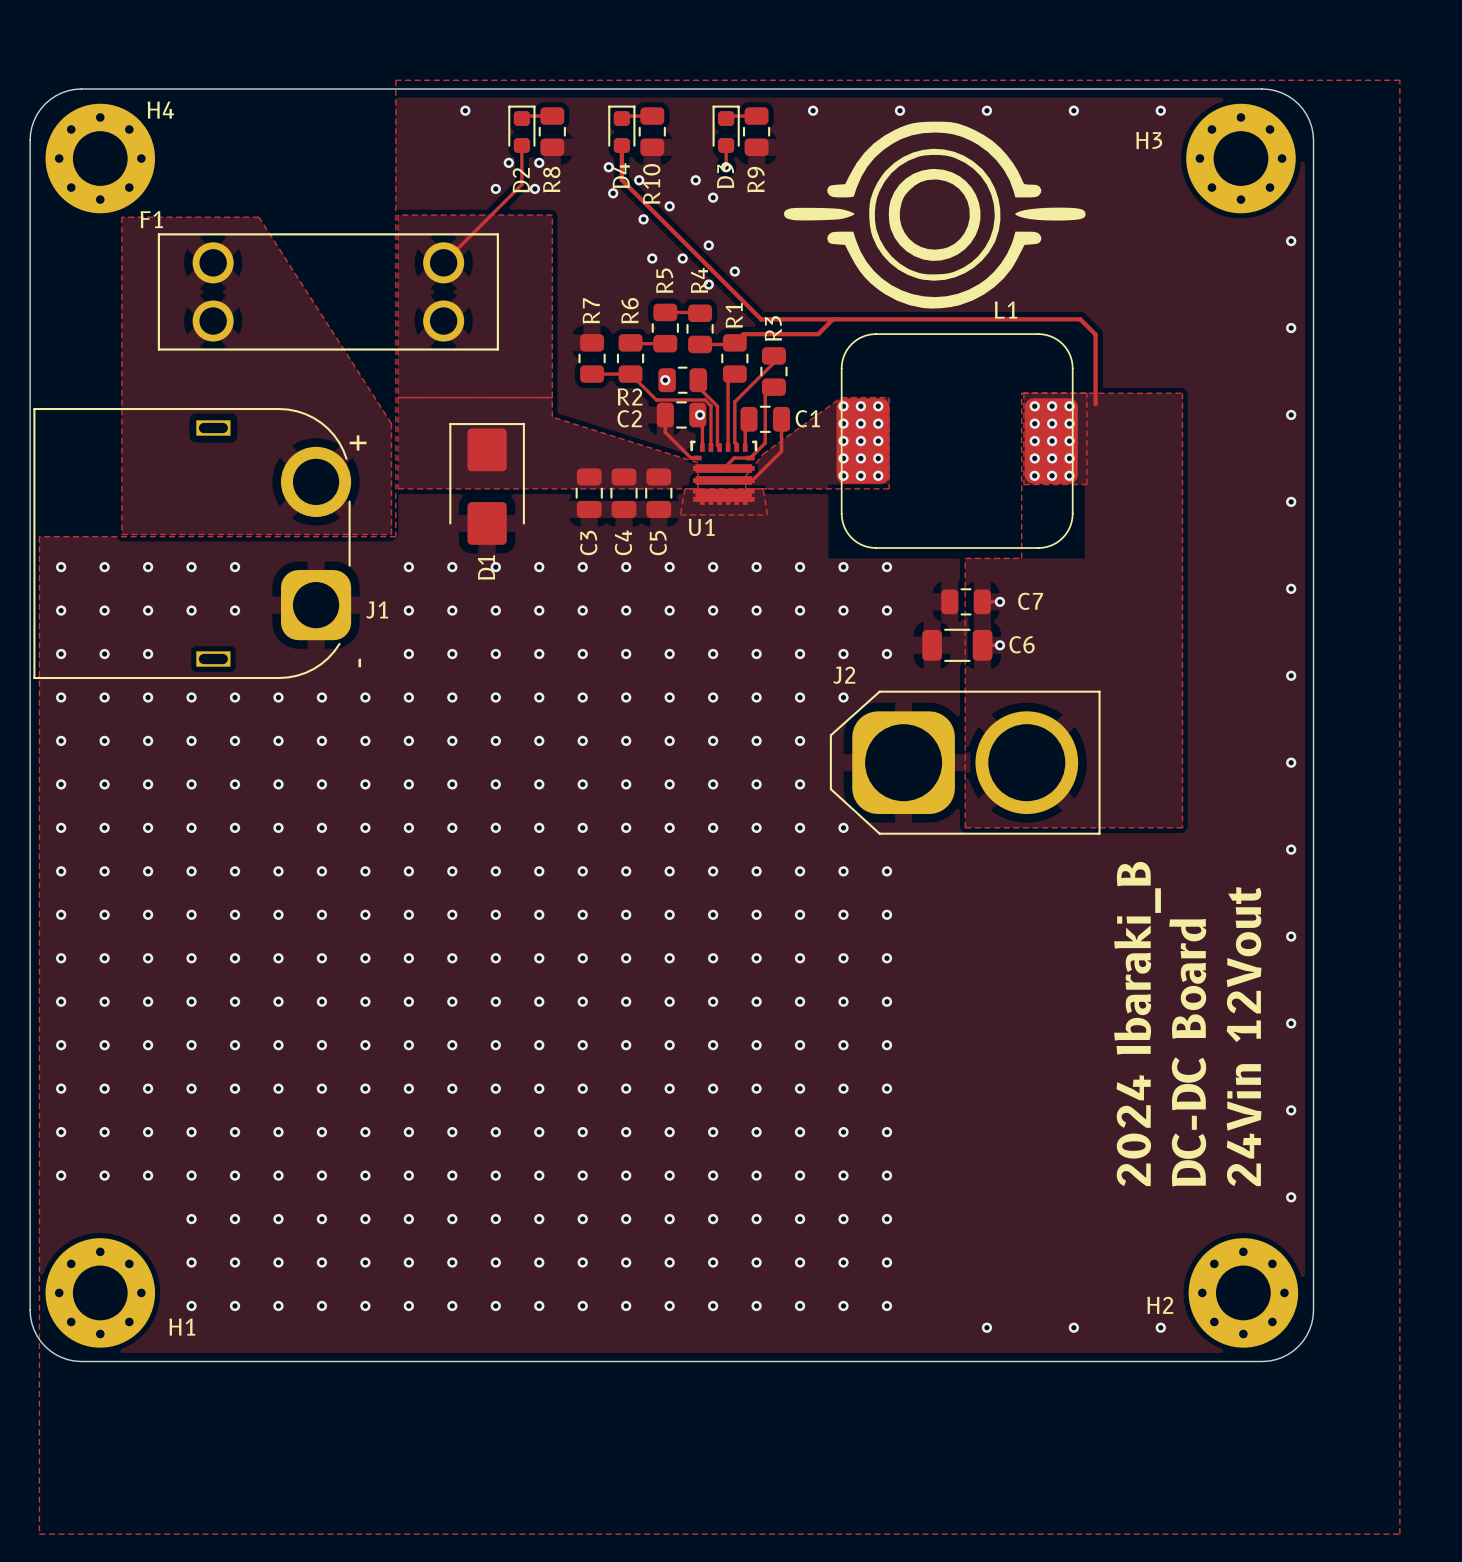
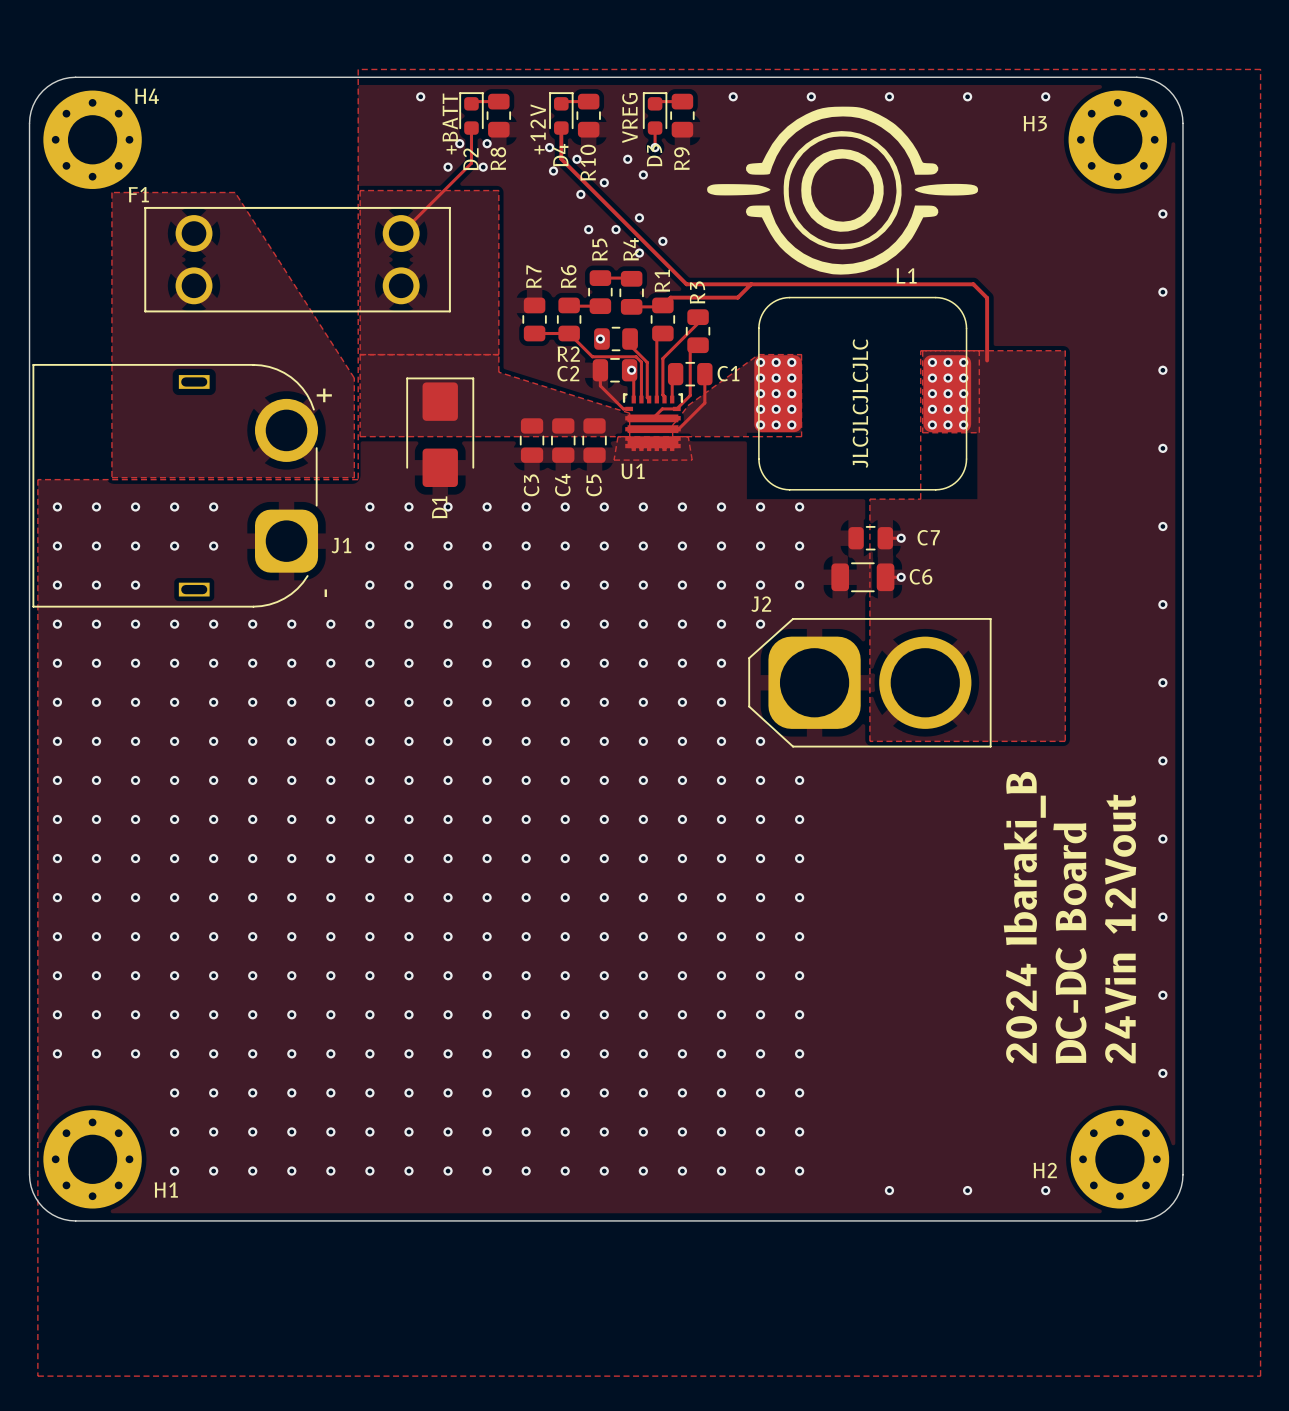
text: none -> VREG (629, 118)
text: none -> +BATT (450, 123)
text: none -> +12V (538, 129)
text: none -> JLCJLCJLCJLC (860, 403)

